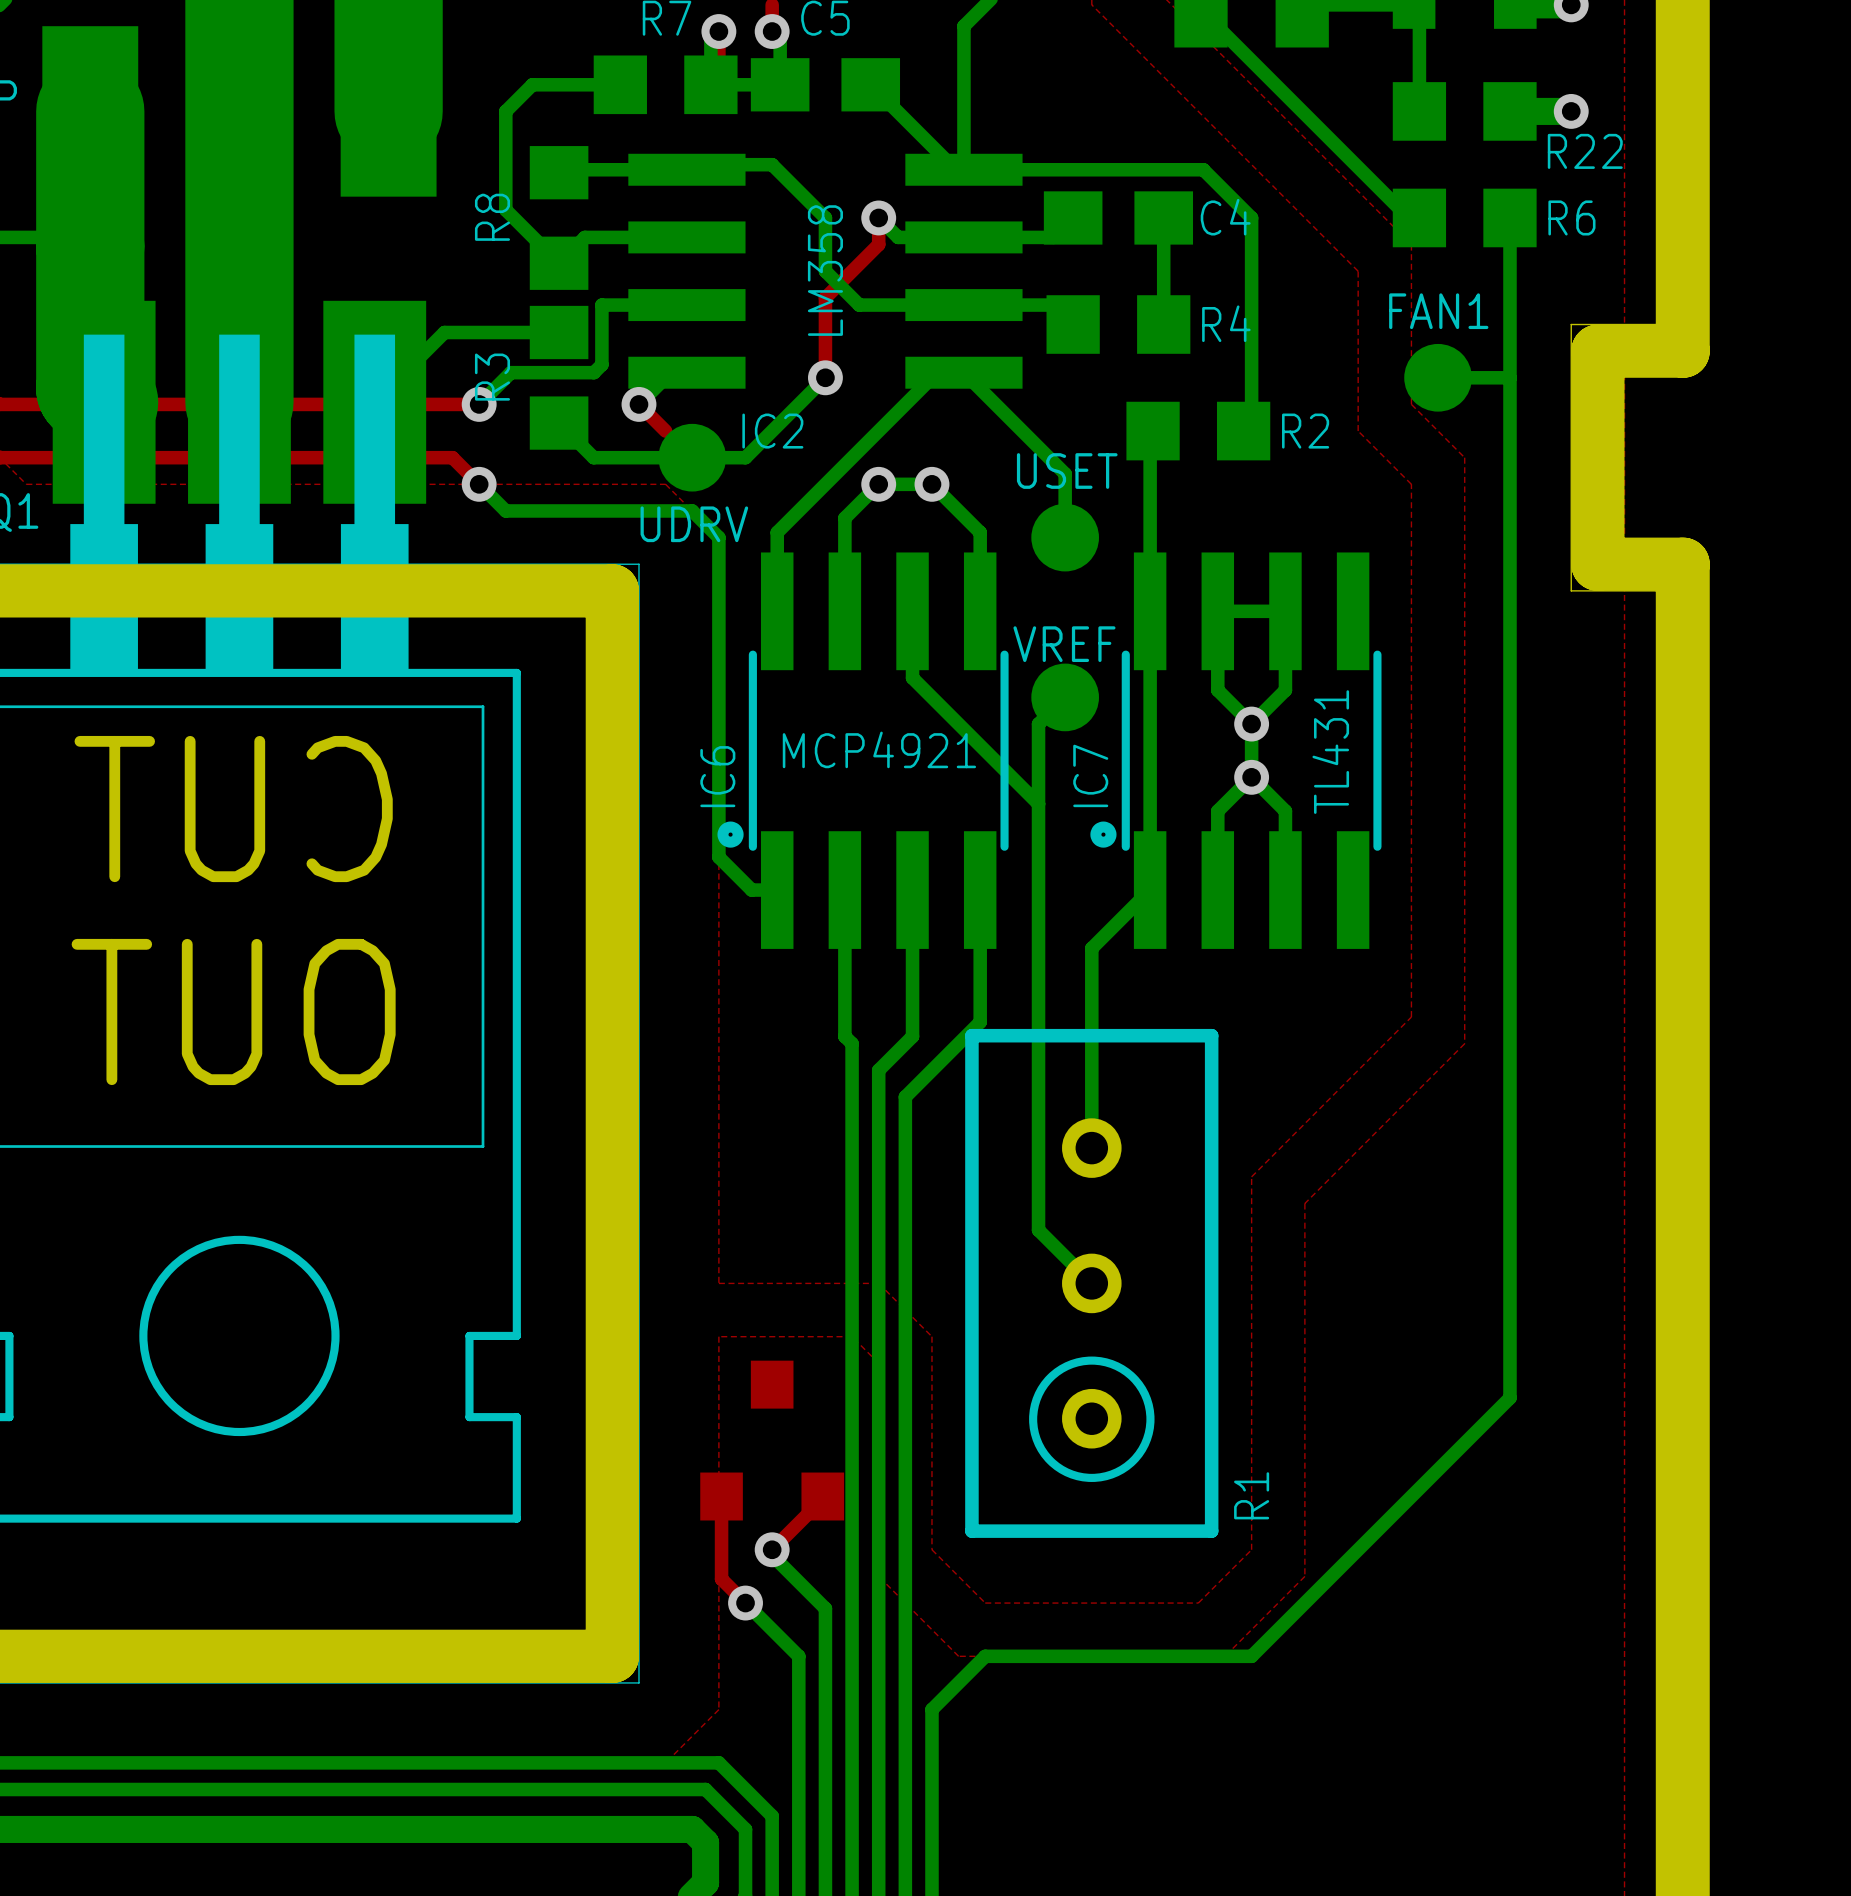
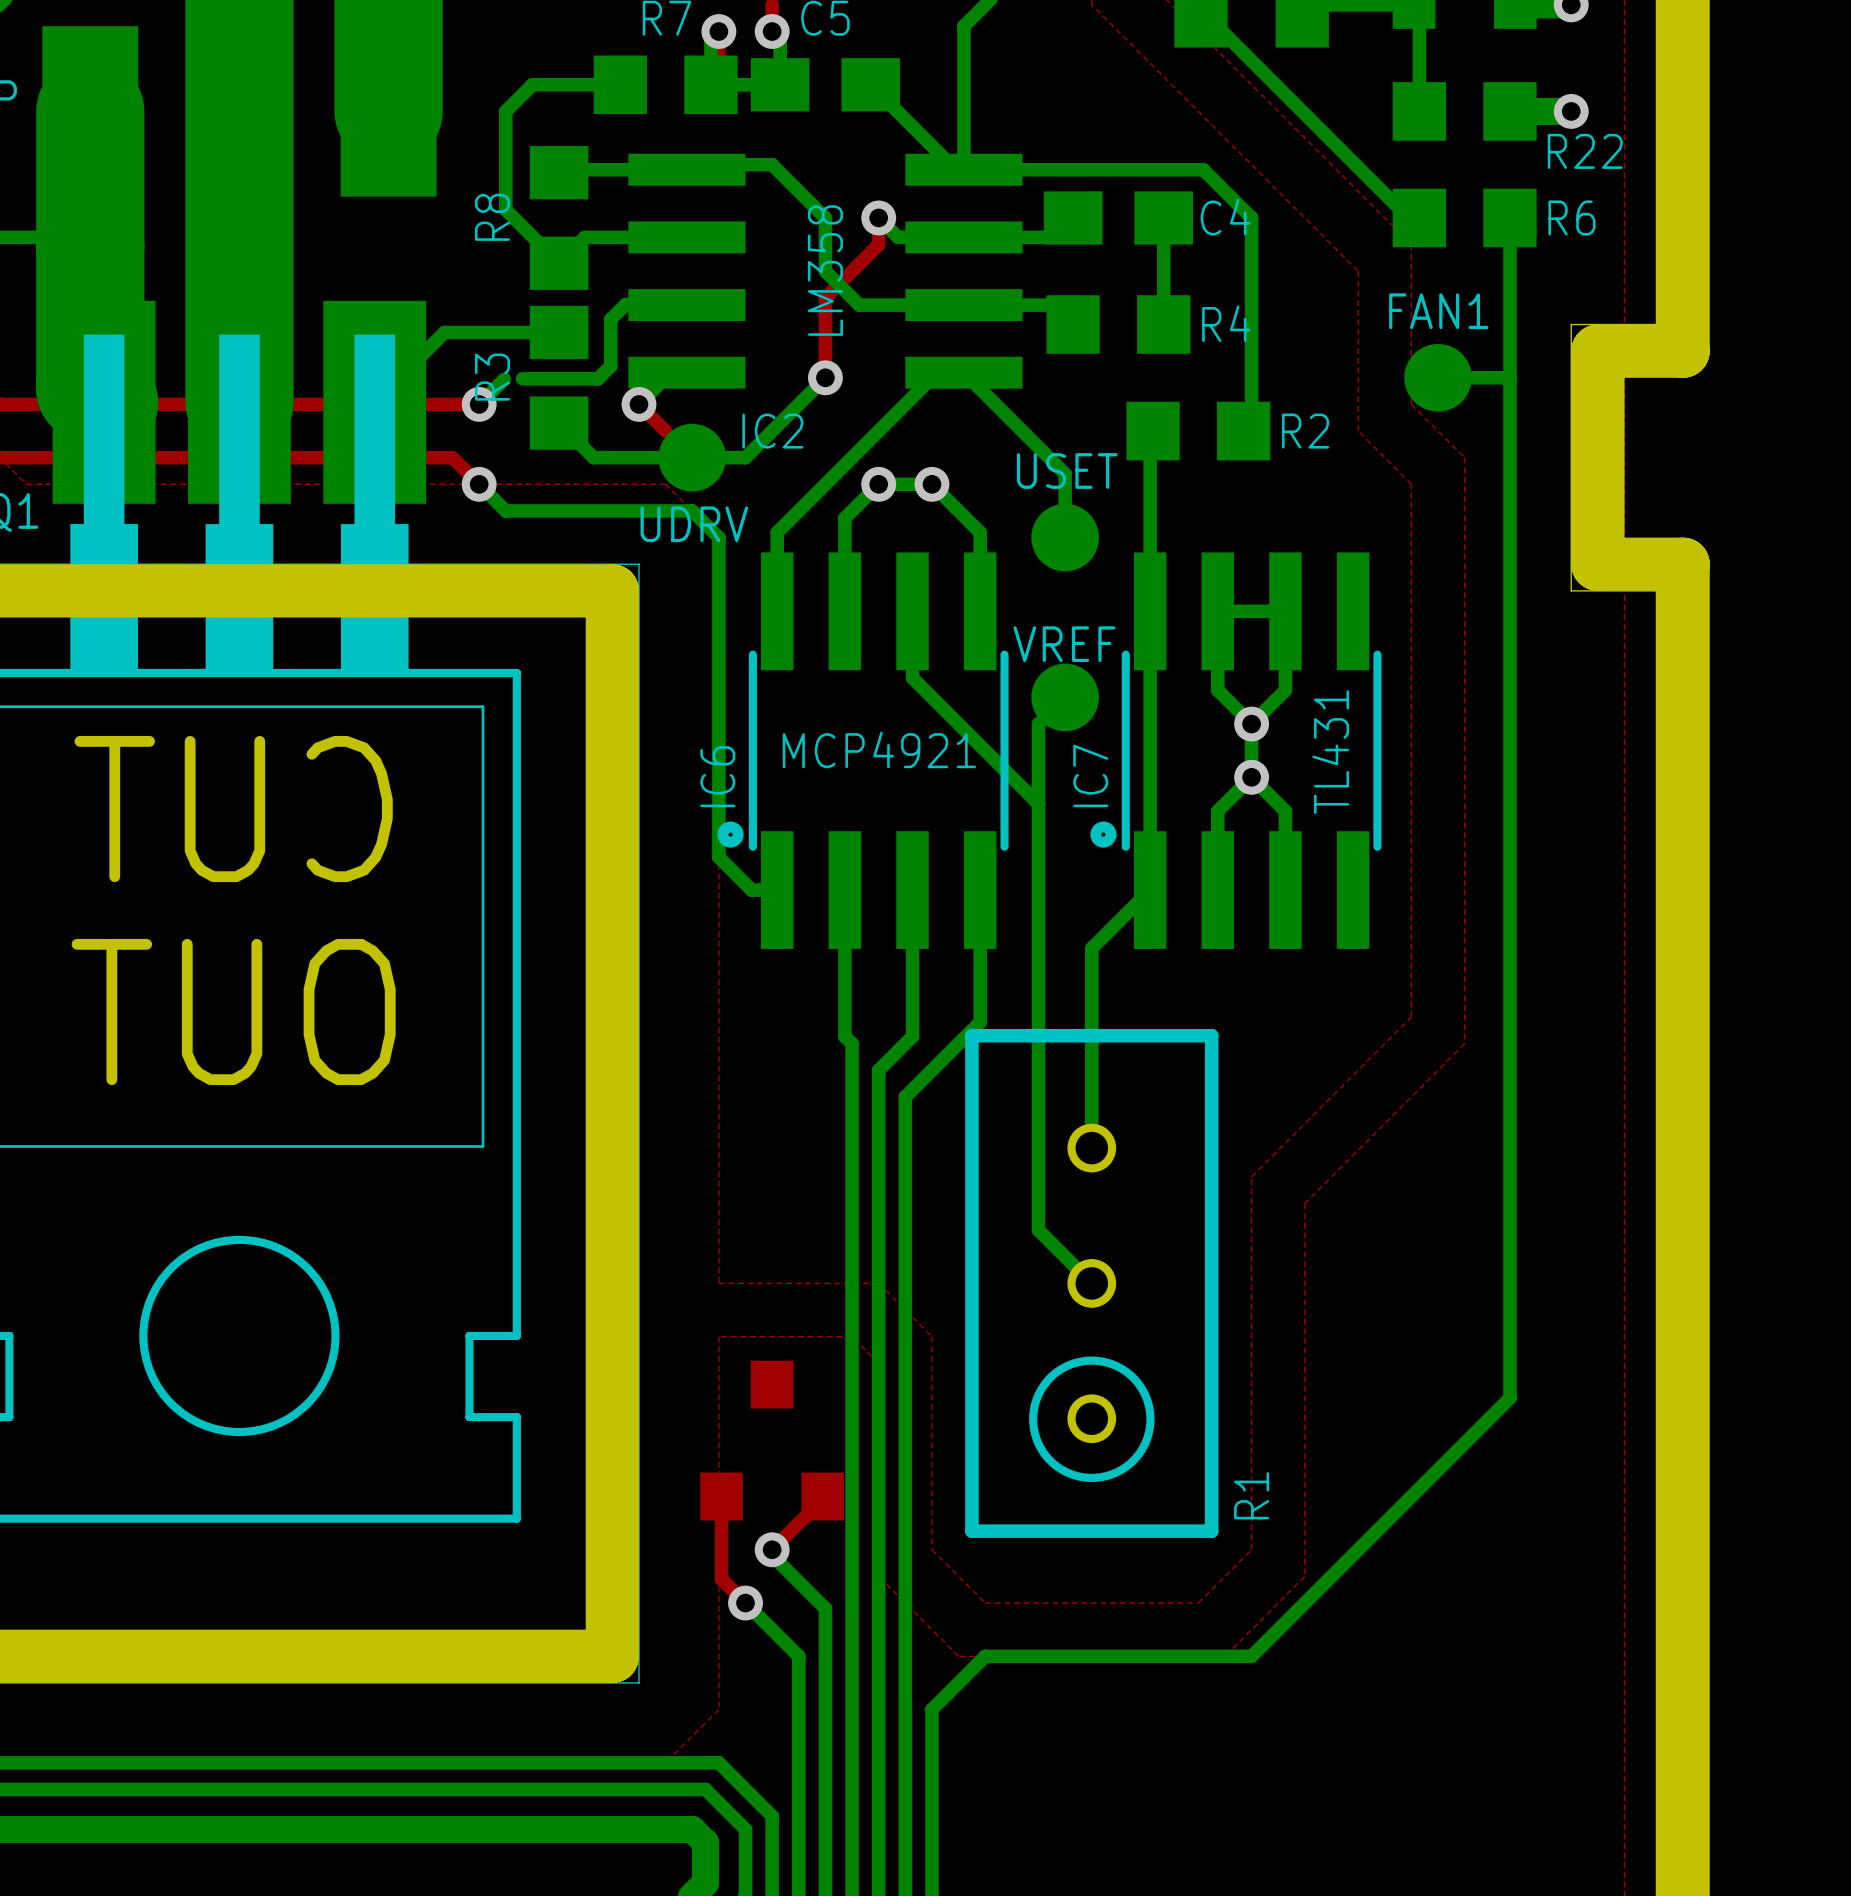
bottom track: (686, 305) (601, 305) (601, 364) (593, 372) (510, 372) (504, 379) -> (686, 304) (625, 304) (610, 319) (610, 366) (597, 378) (522, 378)
R1 footprint: [965, 1028, 1219, 1538] -> [965, 1028, 1219, 1538]

